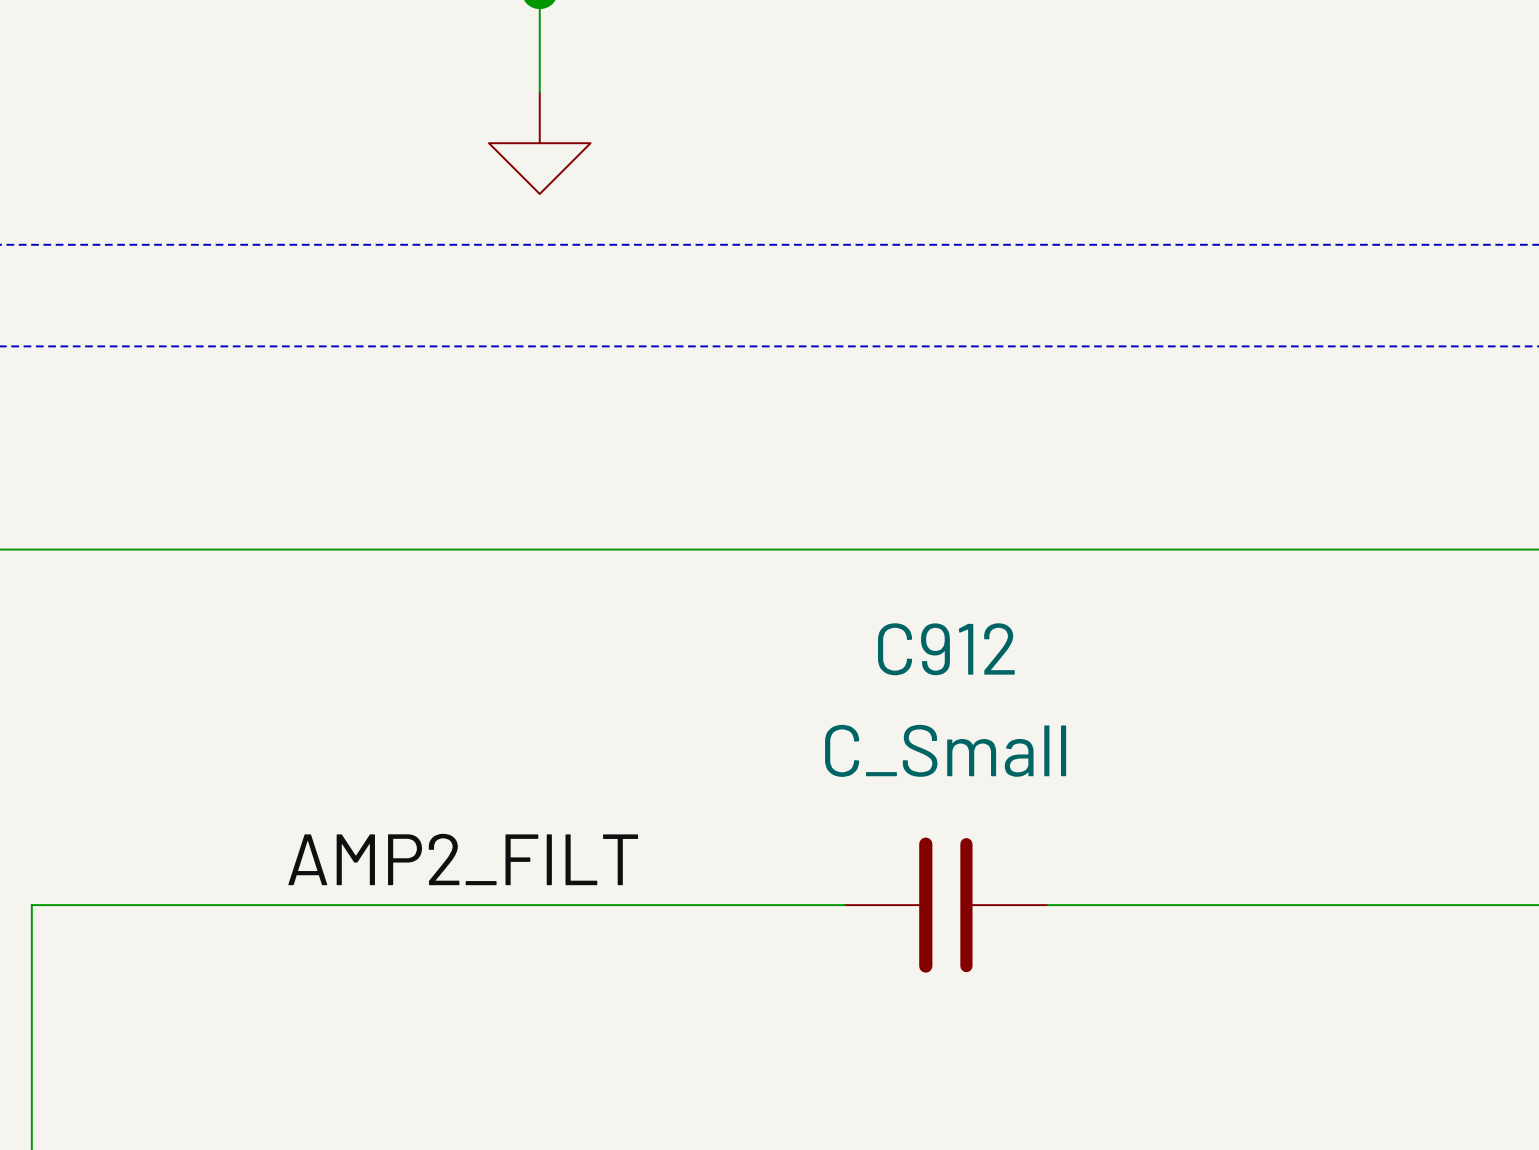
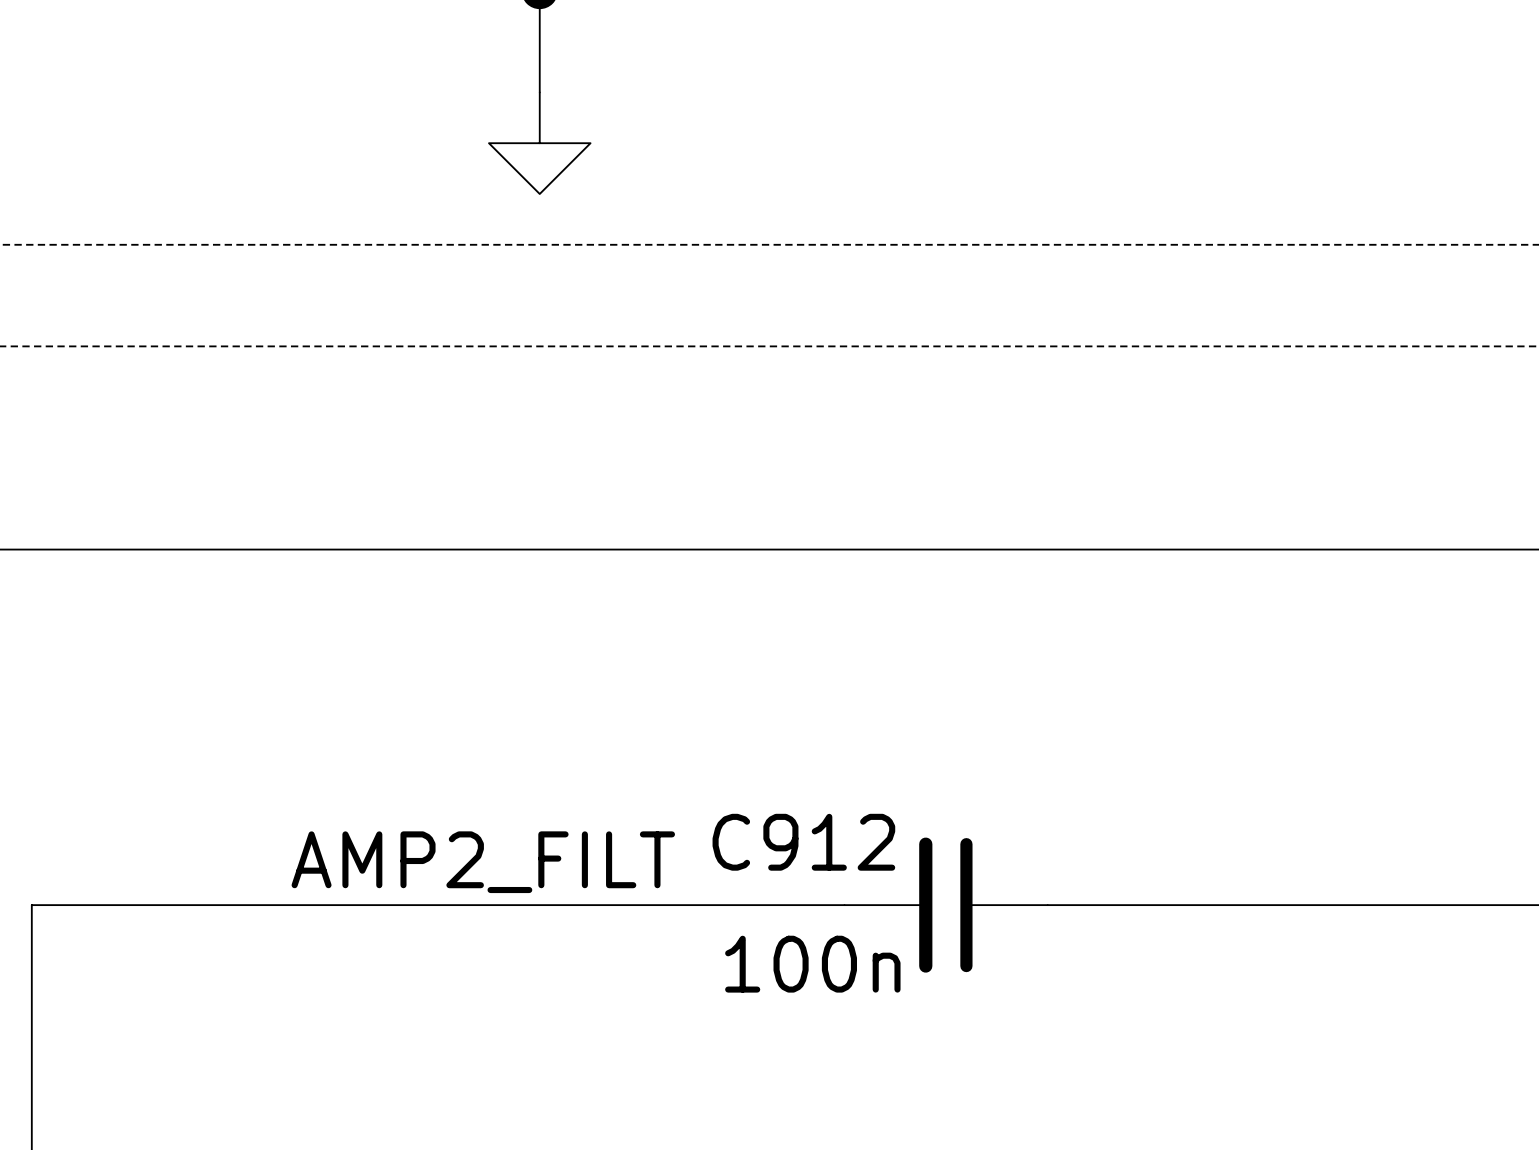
C912 name position: C912 (946, 649) -> C912 (803, 842)
C912 value: C_Small (945, 750) -> 100n (812, 964)

